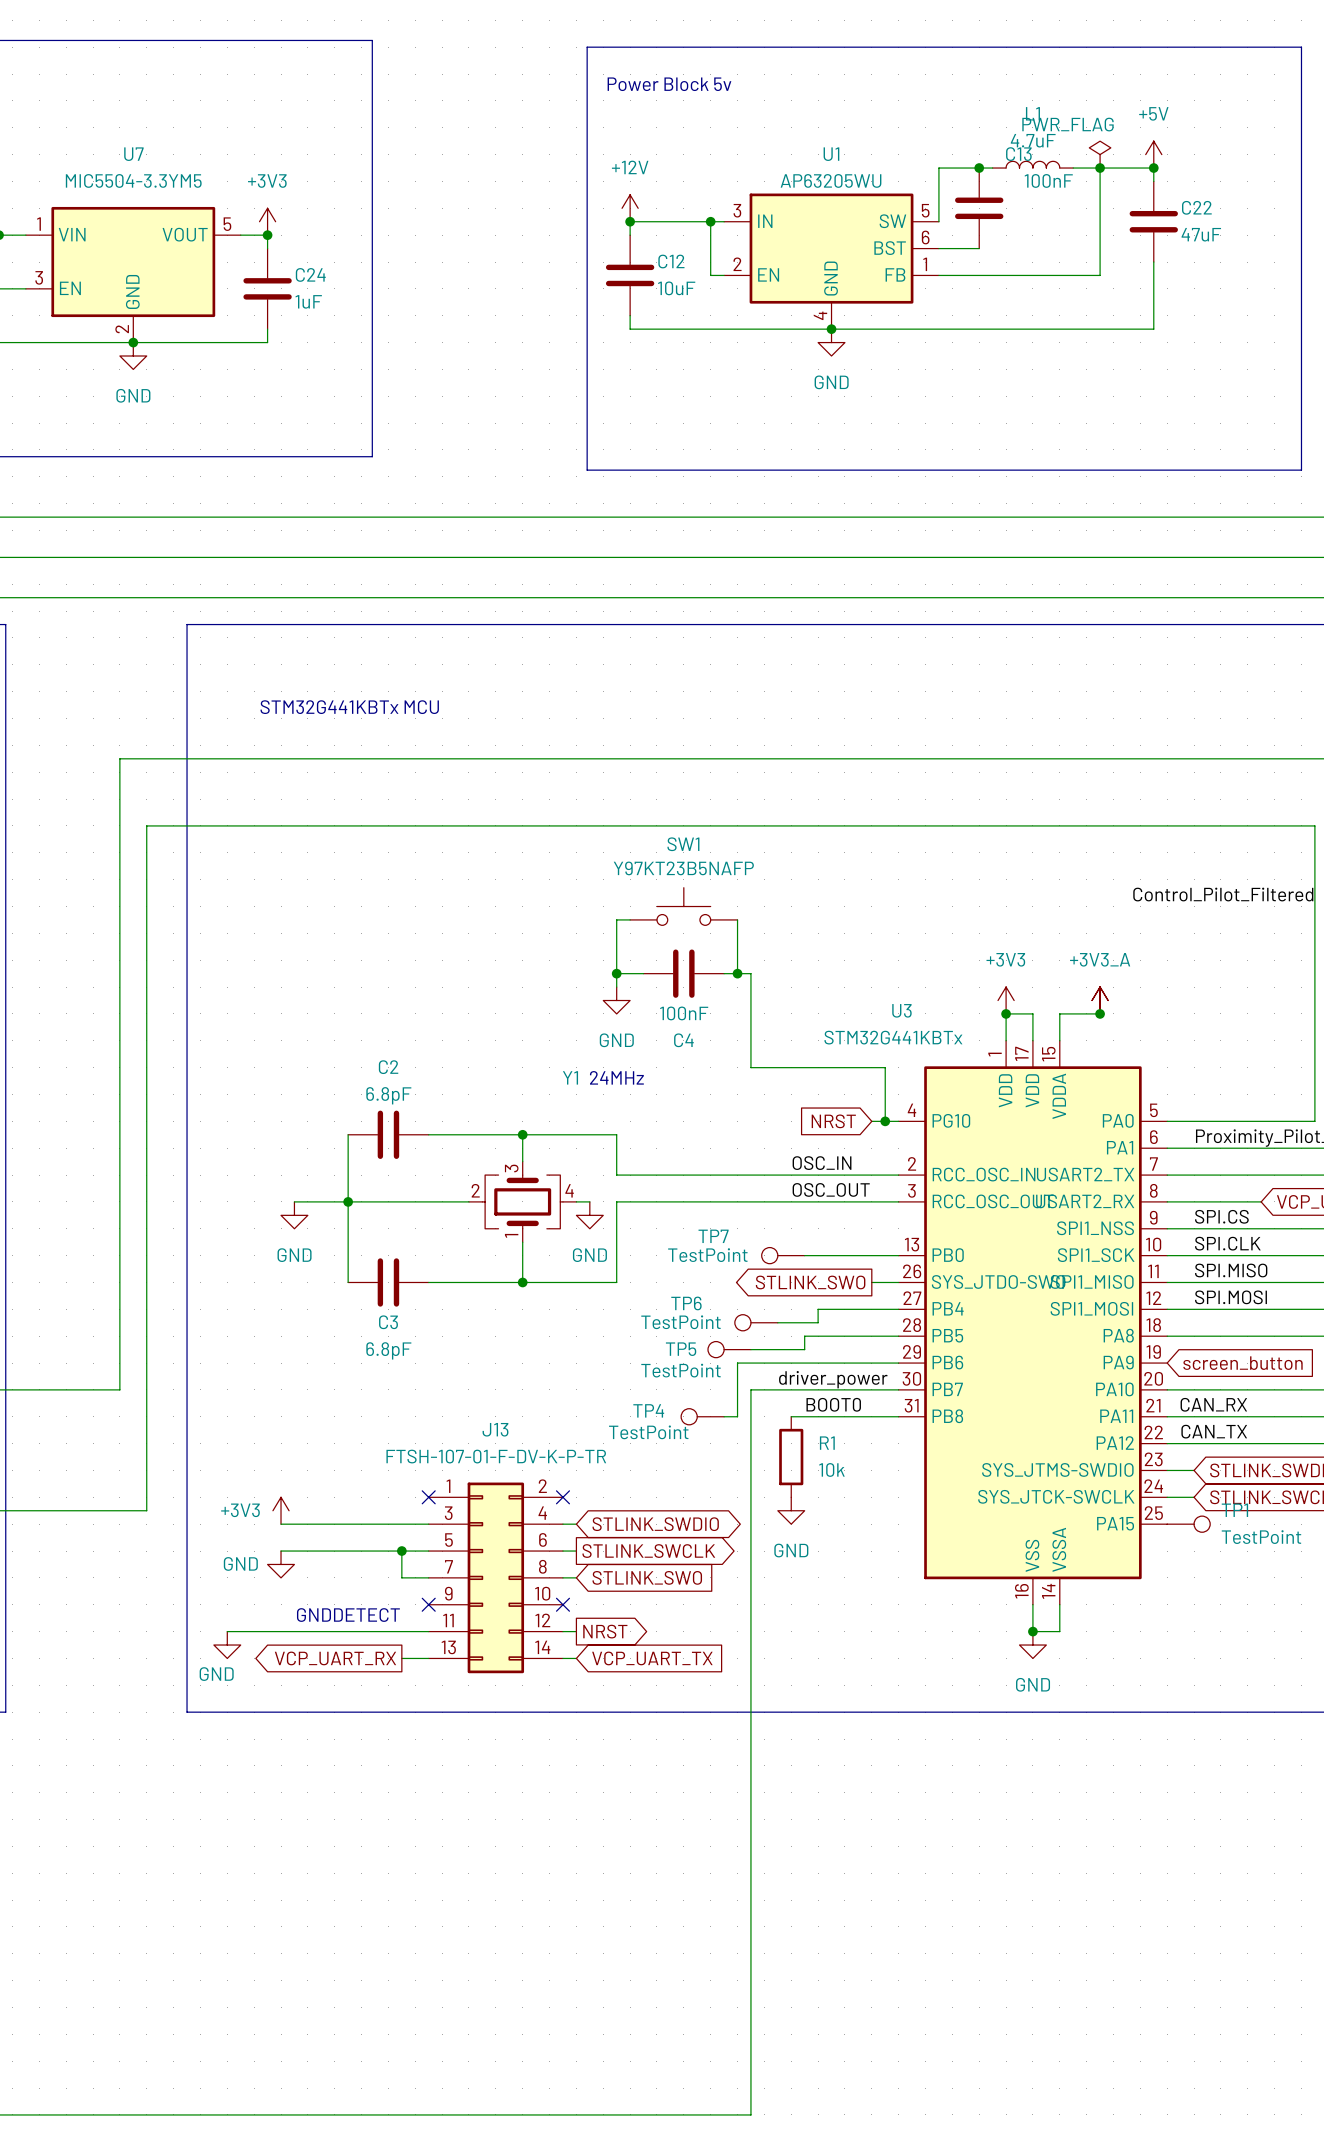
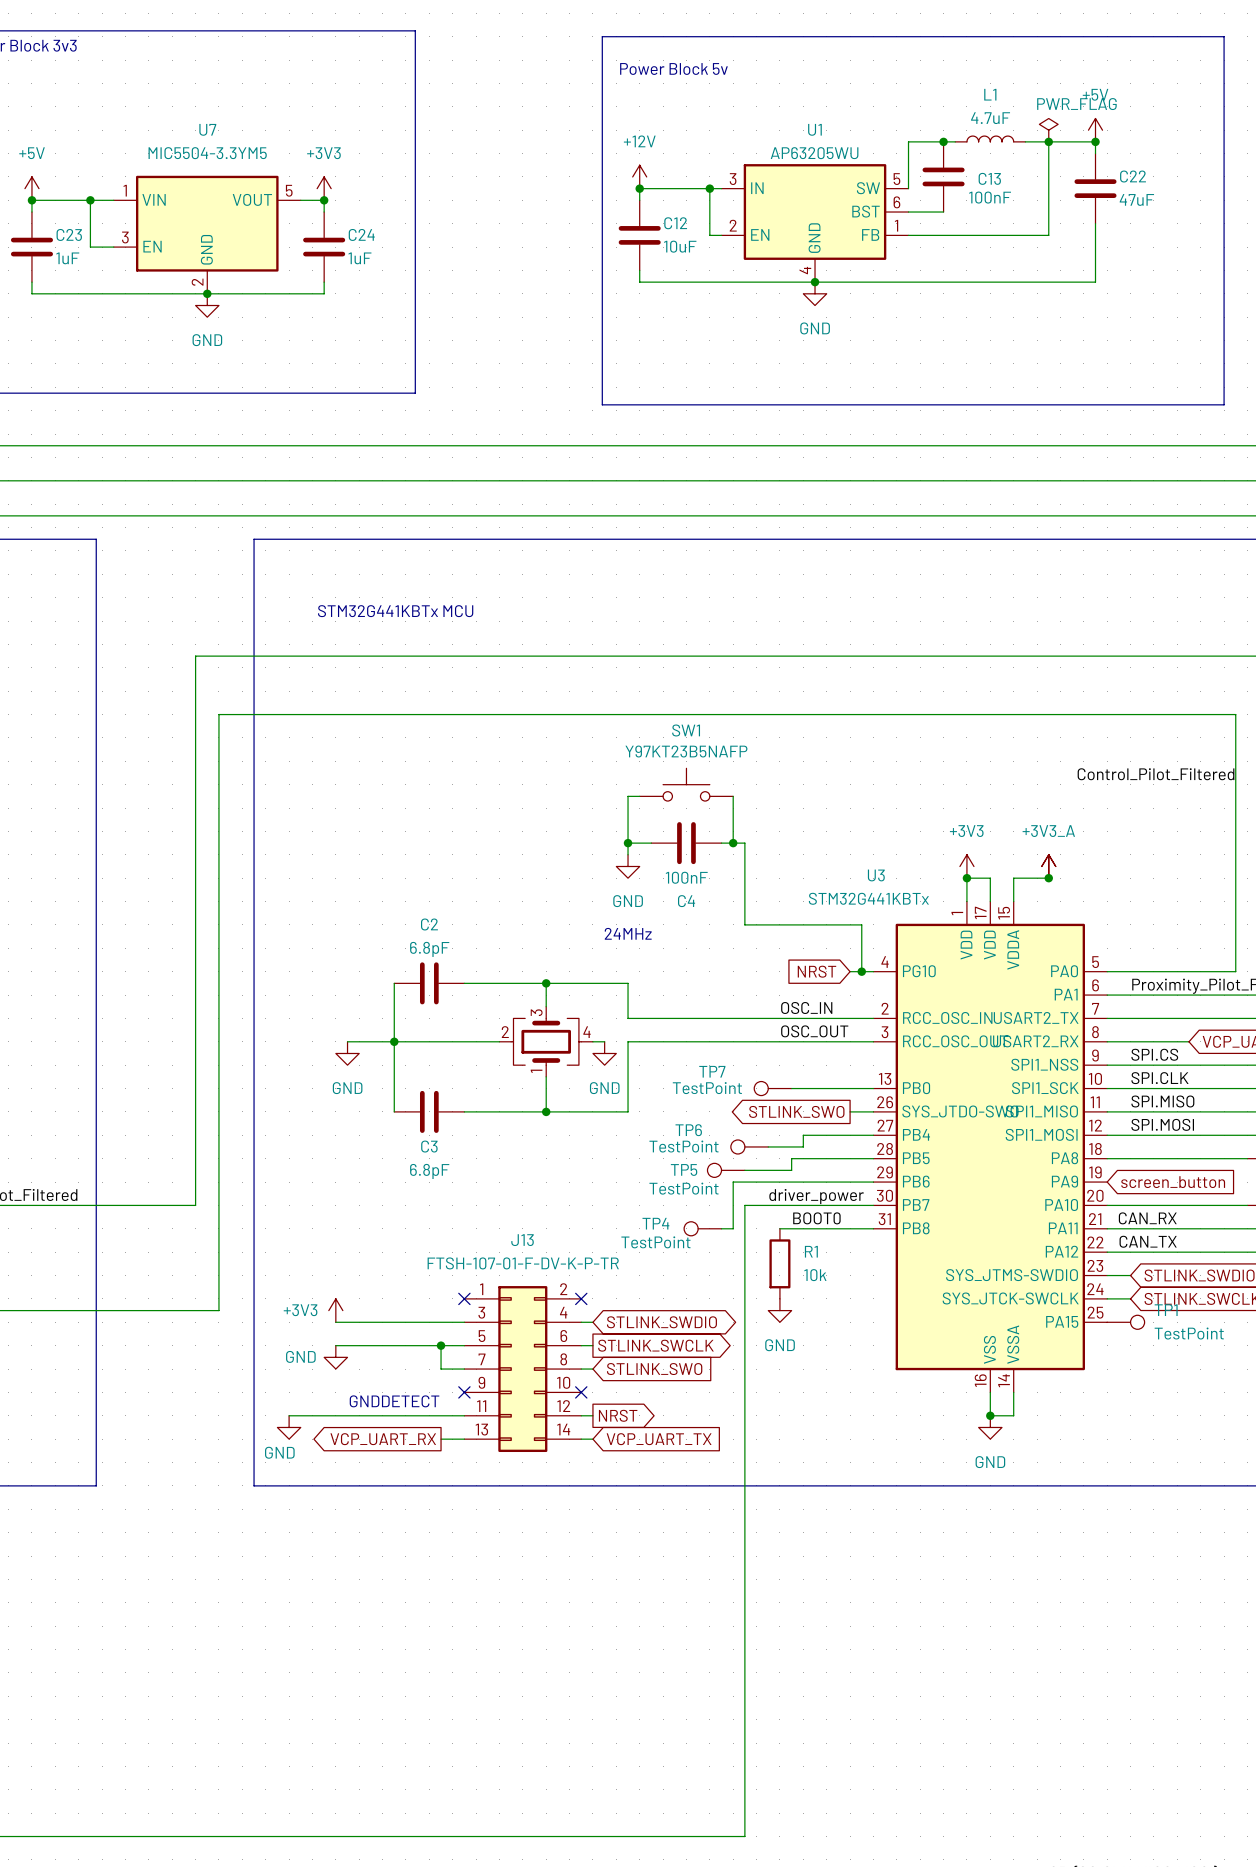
power symbol text position: PWR_FLAG (1067, 124) -> PWR_FLAG (1076, 104)
C13 name position: C13 (1018, 154) -> C13 (989, 178)
C13 value position: 100nF (1048, 180) -> 100nF (990, 197)
Y1 name: Y1 (570, 1077) -> none

